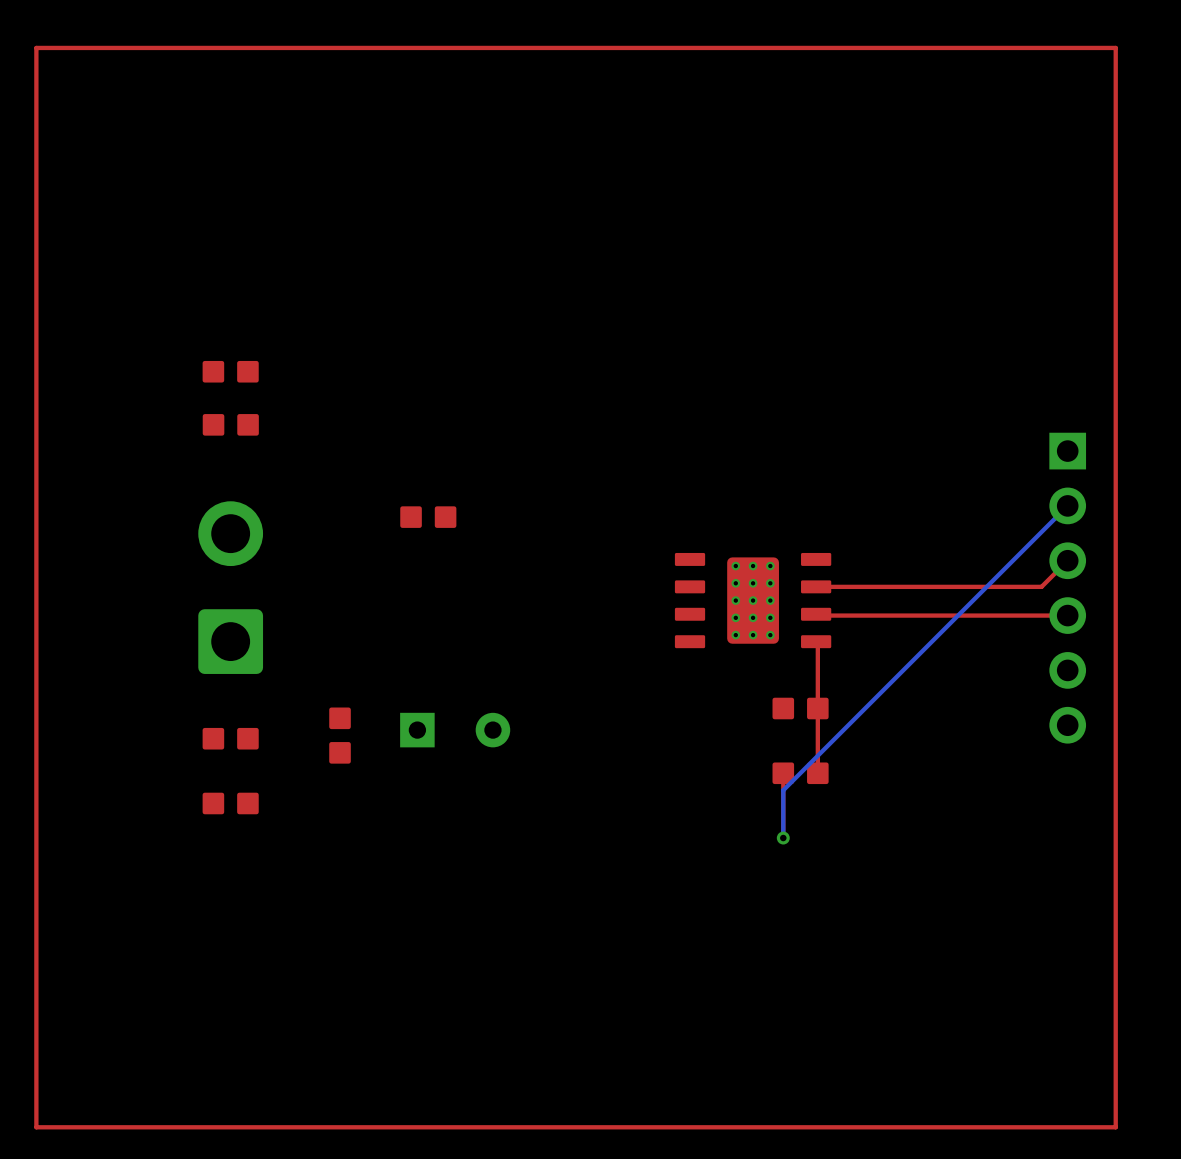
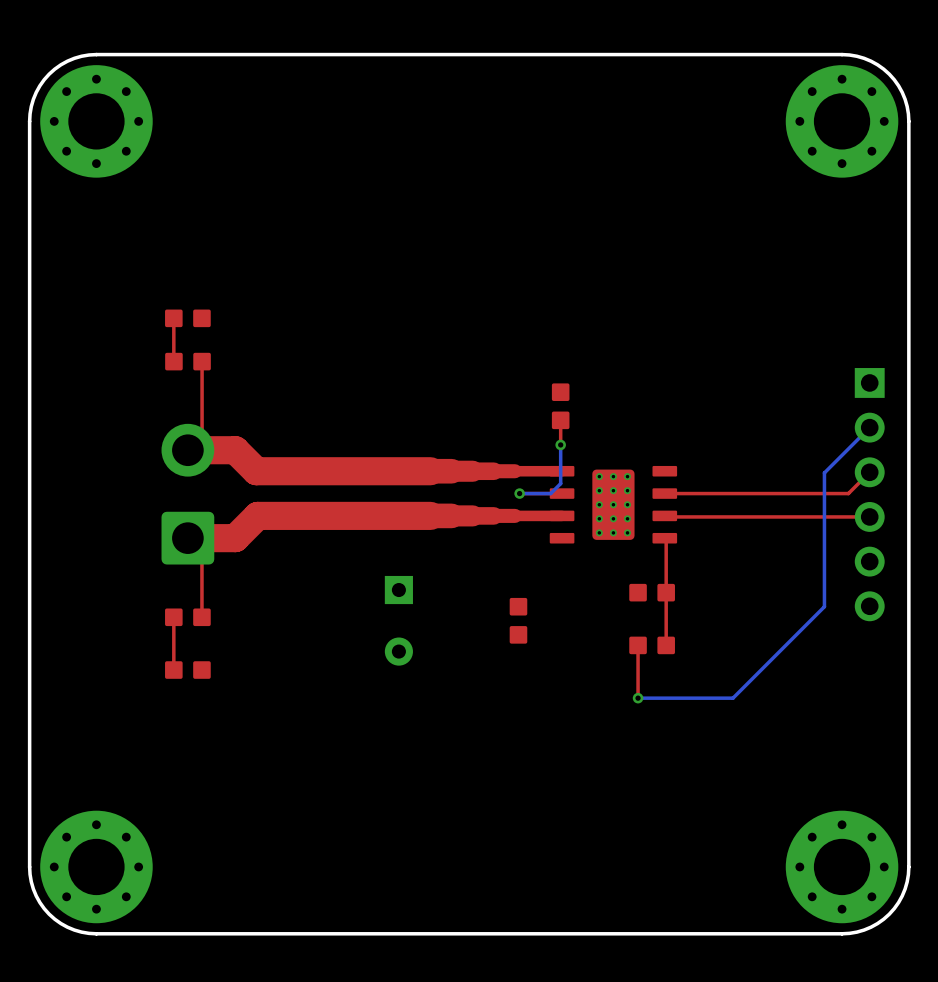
board edge: none -> (842, 54) (96, 54) (81, 56) (67, 61) (49, 74) (36, 92) (31, 106) (29, 121) (29, 866) (31, 881) (36, 895) (49, 914) (60, 923) (74, 930) (96, 933) (842, 933) (856, 932) (871, 927) (889, 914) (898, 902) (905, 889) (908, 866) (908, 121) (907, 106) (902, 92) (889, 74) (871, 61) (856, 56) (842, 54)
top track: (1115, 47) (36, 47) (36, 1127) (1115, 1127) (1115, 47) -> none
part: none -> (96, 121)
part: none -> (842, 121)
top track: none -> (173, 318) (173, 361)
top track: none -> (202, 361) (202, 436) (187, 450) (235, 450) (256, 471) (562, 471)
part: none -> (560, 406)
top track: none -> (560, 420) (560, 444)
part: (428, 517) -> none
bottom track: none -> (560, 444) (560, 483) (550, 493) (519, 493)
via: none -> (560, 444)
bottom track: (1012, 561) (783, 790) (783, 838) -> (824, 472) (824, 606) (733, 698) (638, 698)
via: none -> (519, 493)
top track: none -> (562, 515) (257, 515) (235, 538) (187, 538) (201, 552) (201, 617)
part rotation: 0° (455, 730) -> 90° clockwise (398, 620)
part: (340, 735) -> none
top track: none -> (173, 617) (173, 670)
part: none -> (518, 620)
part: none -> (96, 866)
part: none -> (842, 866)

